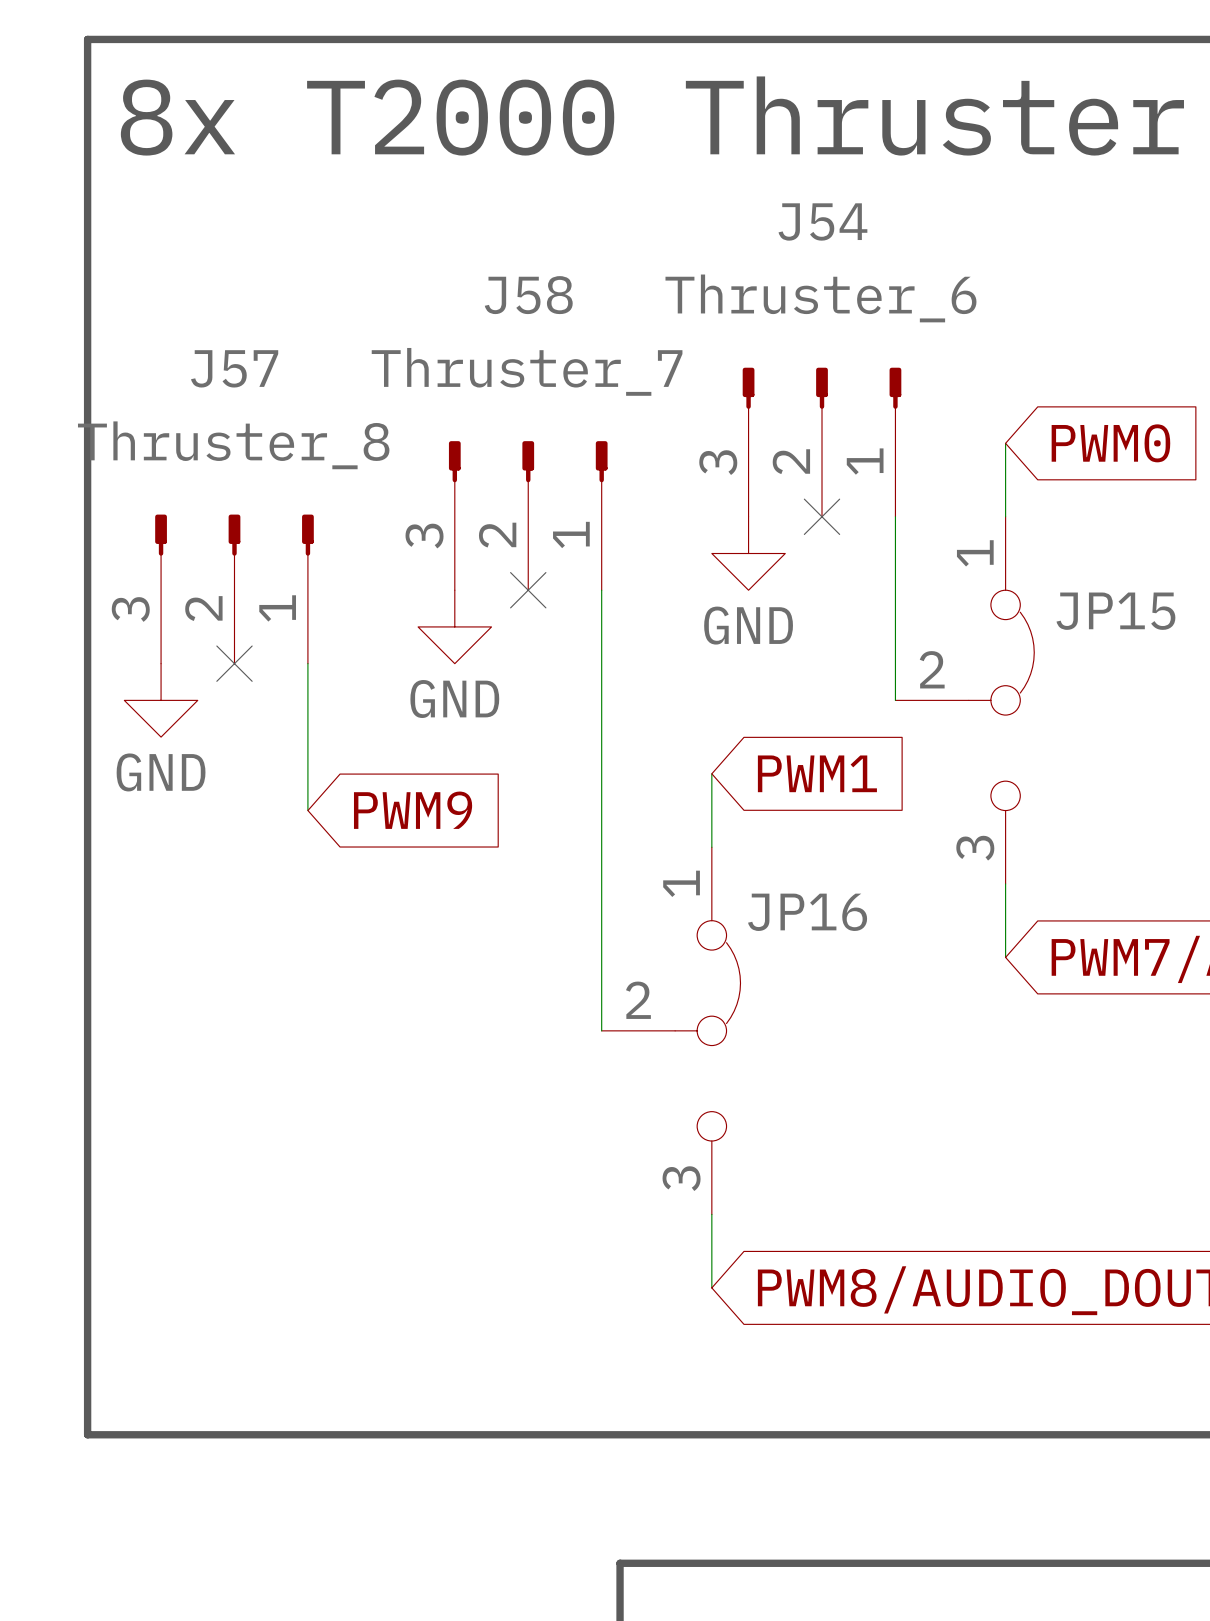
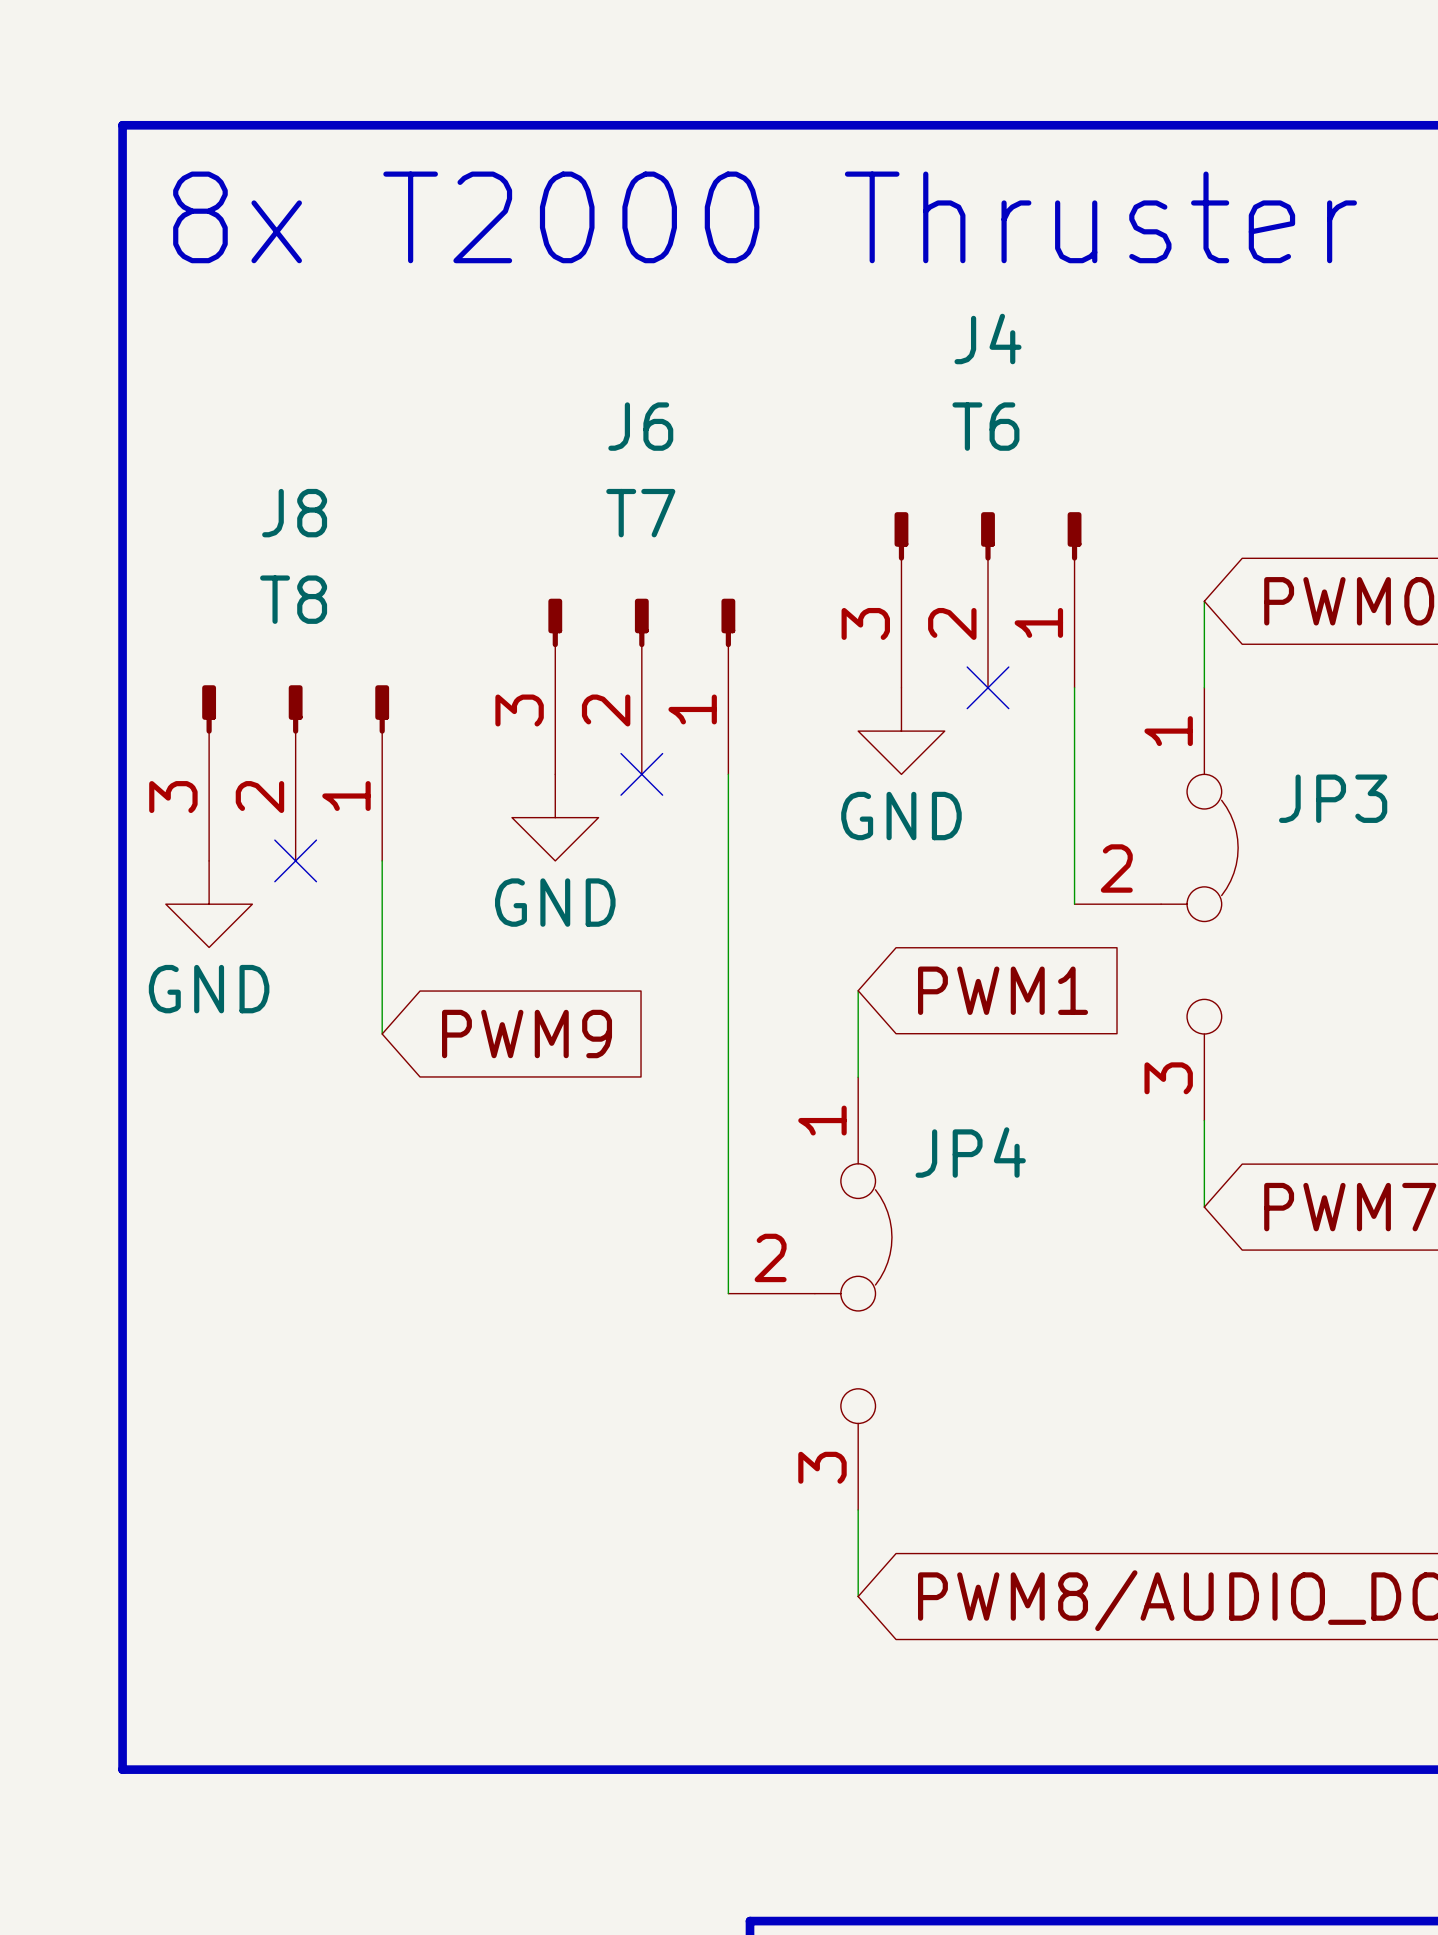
J54 name: J54 (822, 221) -> J4 (988, 339)
J58 name: J58 (528, 295) -> J6 (640, 426)
J54 value: Thruster_6 (820, 298) -> T6 (985, 426)
J57 name: J57 (234, 368) -> J8 (294, 513)
J58 value: Thruster_7 (527, 371) -> T7 (640, 513)
J57 value: Thruster_8 (233, 445) -> T8 (293, 599)
JP15 name: JP15 (1115, 611) -> JP3 (1333, 798)
JP16 name: JP16 (807, 912) -> JP4 (970, 1152)

